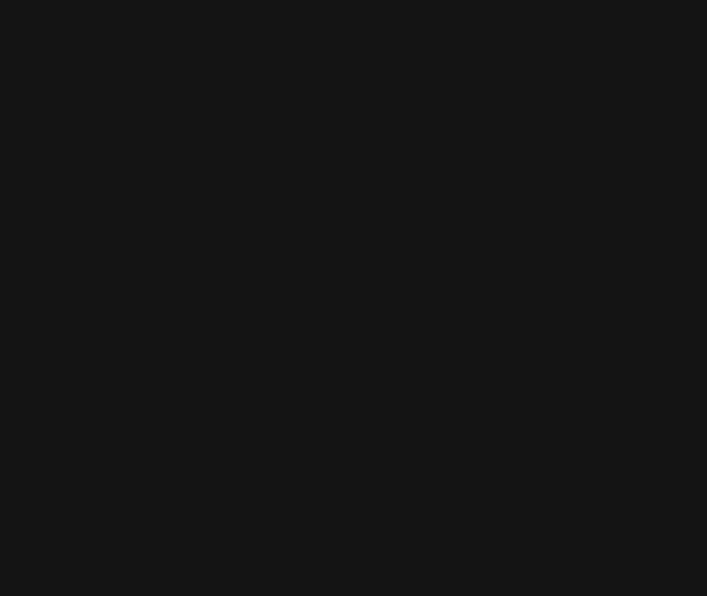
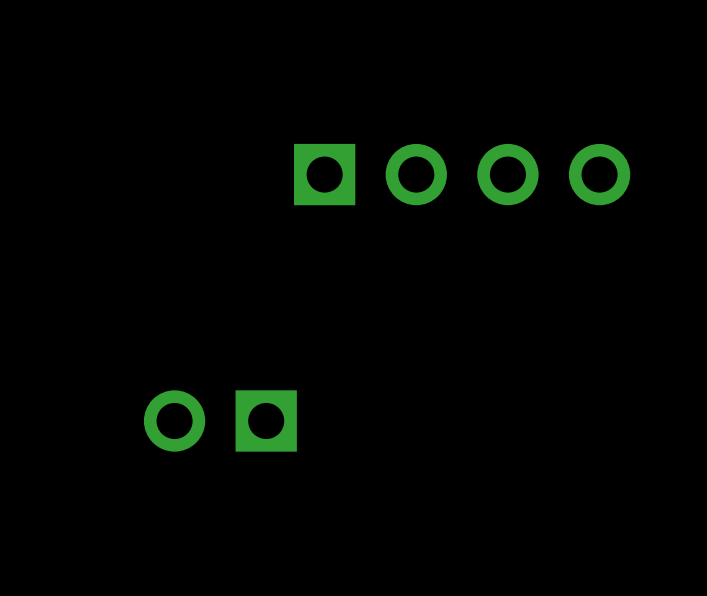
part: none -> (462, 174)
part: none -> (220, 420)

